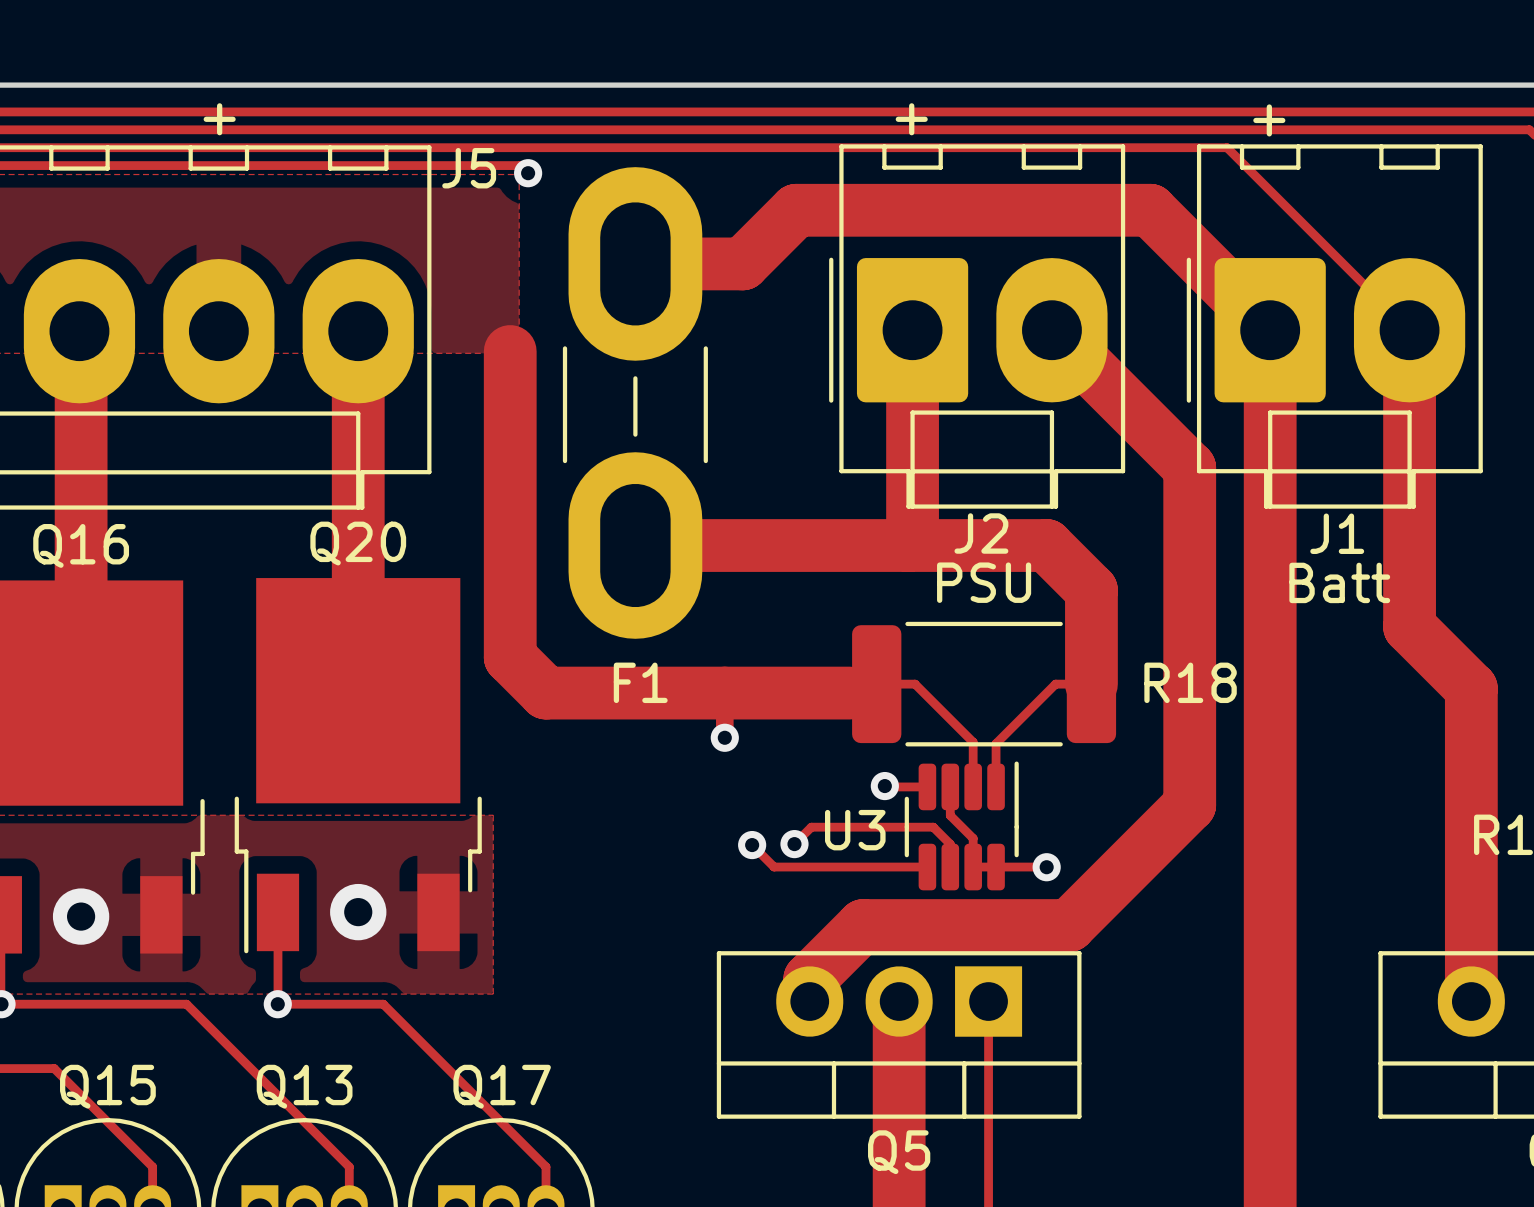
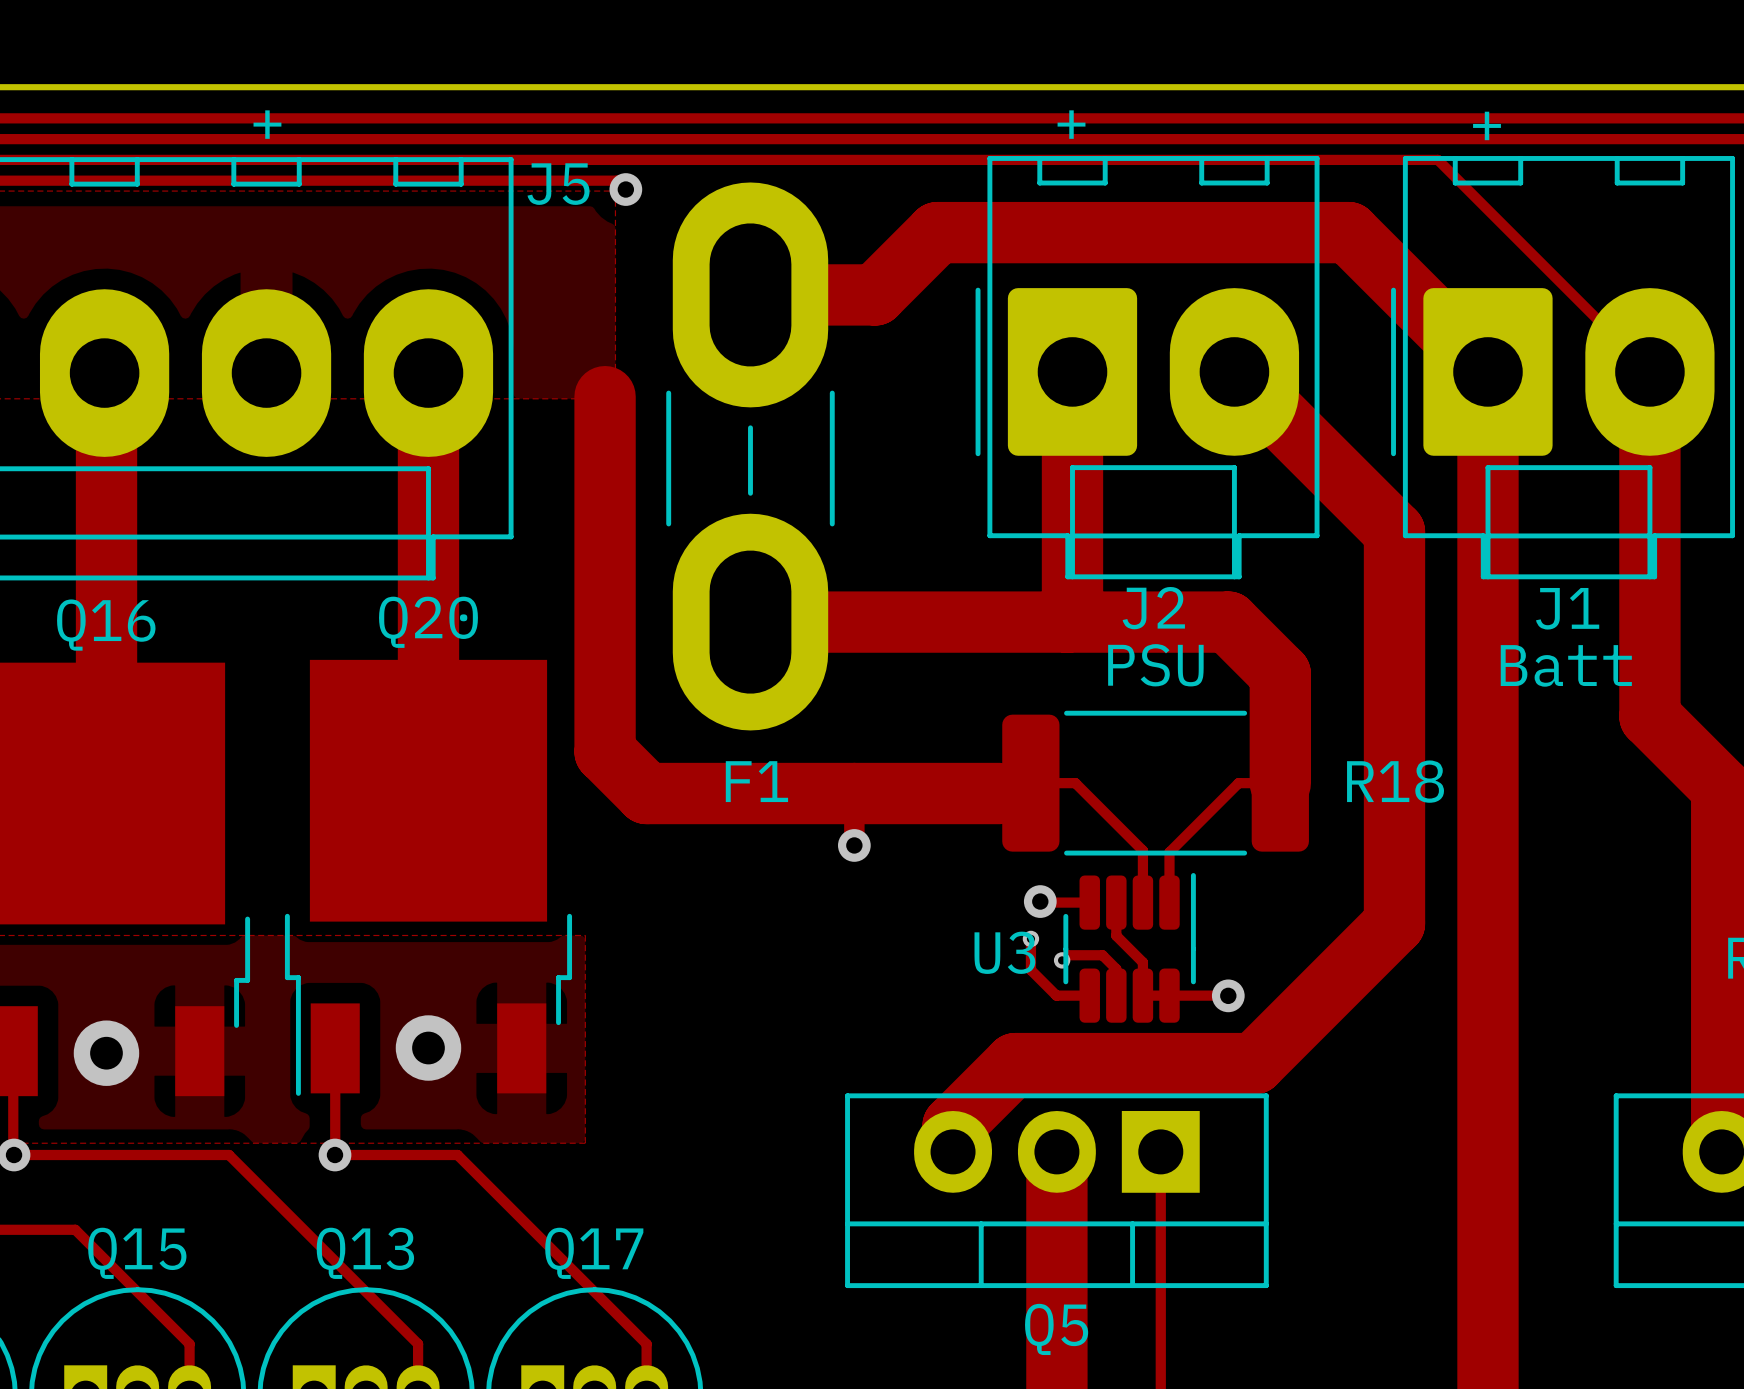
via: none -> (1030, 938)
track: (938, 832) (933, 827) (811, 827) (794, 844) -> (1102, 955) (1067, 955) (1062, 960)
via: none -> (1062, 960)
via: (794, 844) -> none
track: (752, 845) (774, 867) (898, 867) -> (1030, 938) (1030, 970) (1056, 995)
via: (752, 845) -> none

